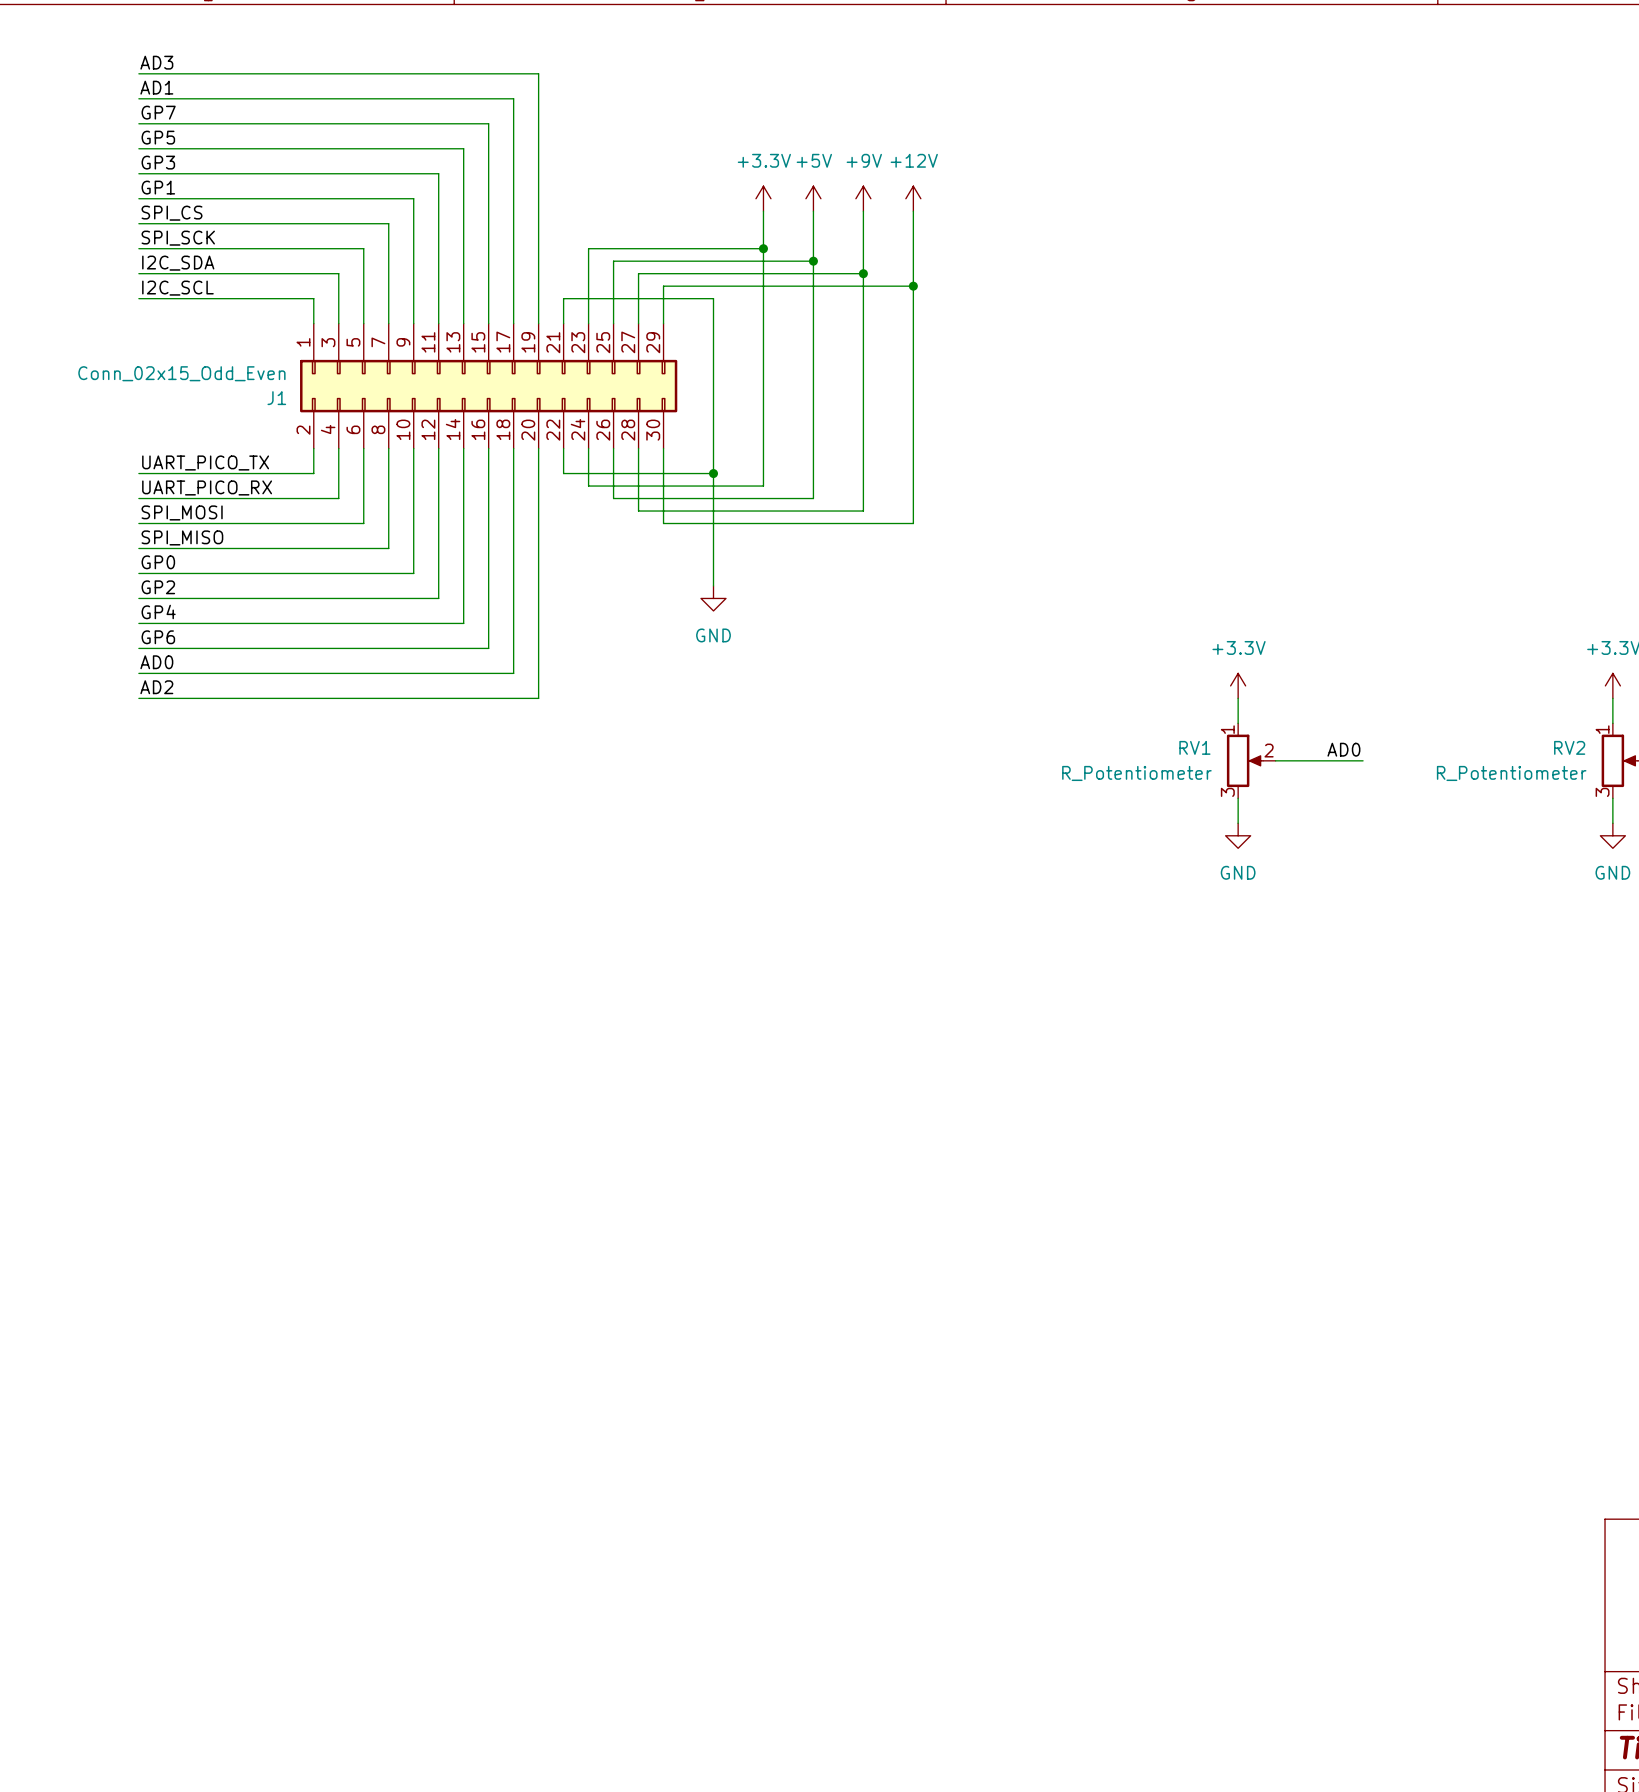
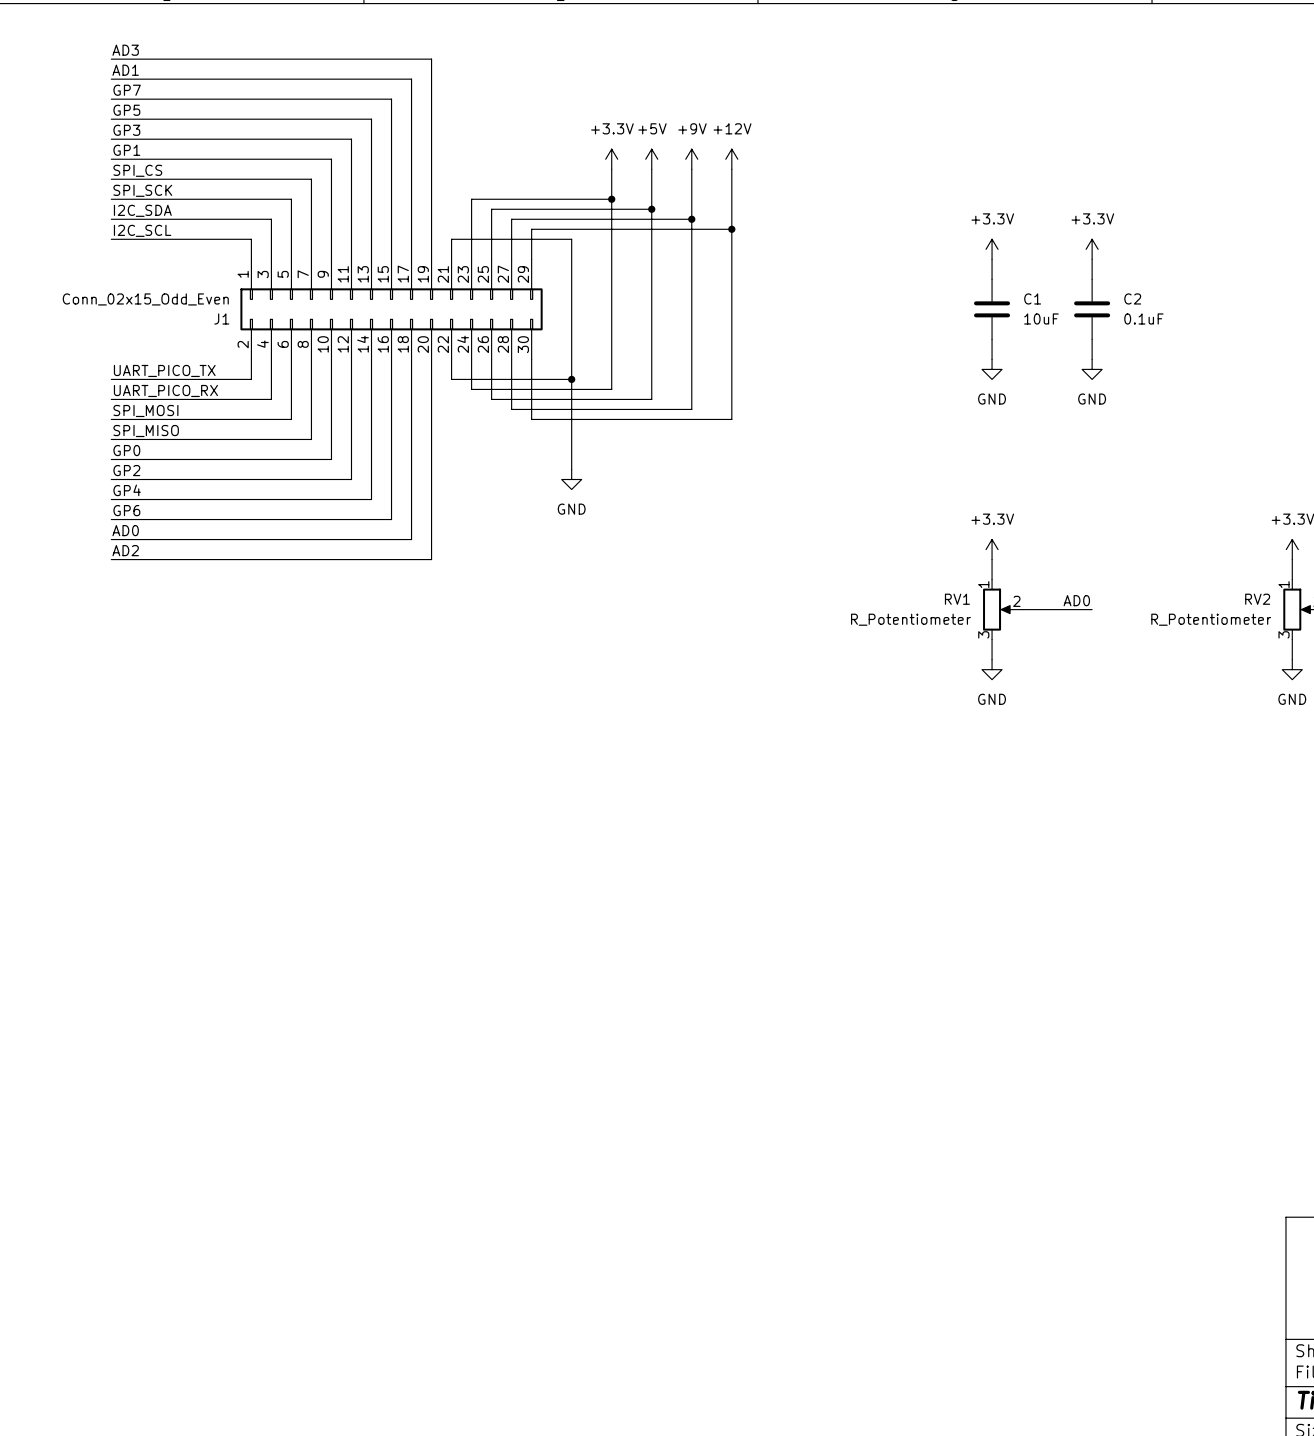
power symbol: none -> +3.3V (992, 249)
power symbol: none -> +3.3V (1092, 249)
wire: none -> (992, 259) (992, 279)
wire: none -> (1092, 259) (1092, 279)
C1: none -> 10uF (992, 309)
C2: none -> 0.1uF (1092, 309)
wire: none -> (992, 339) (992, 359)
wire: none -> (1092, 339) (1092, 359)
power symbol: none -> GND (992, 369)
power symbol: none -> GND (1092, 369)

